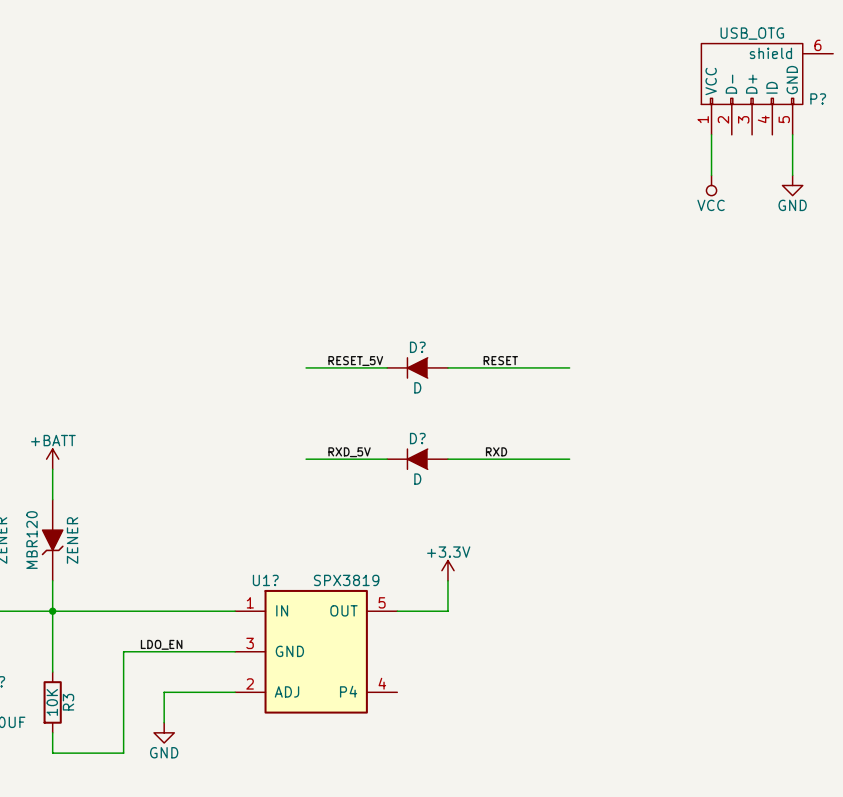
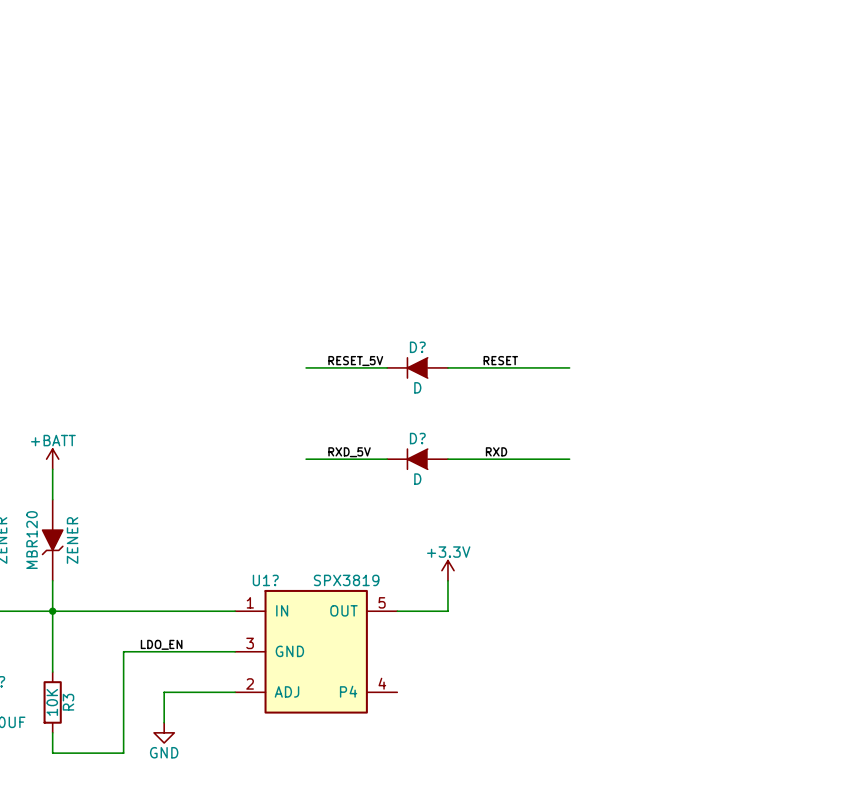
P?: USB_OTG (767, 89) -> none
wire: (711, 134) (711, 175) -> none
wire: (792, 134) (792, 175) -> none
power symbol: VCC (711, 185) -> none
power symbol: GND (792, 185) -> none

